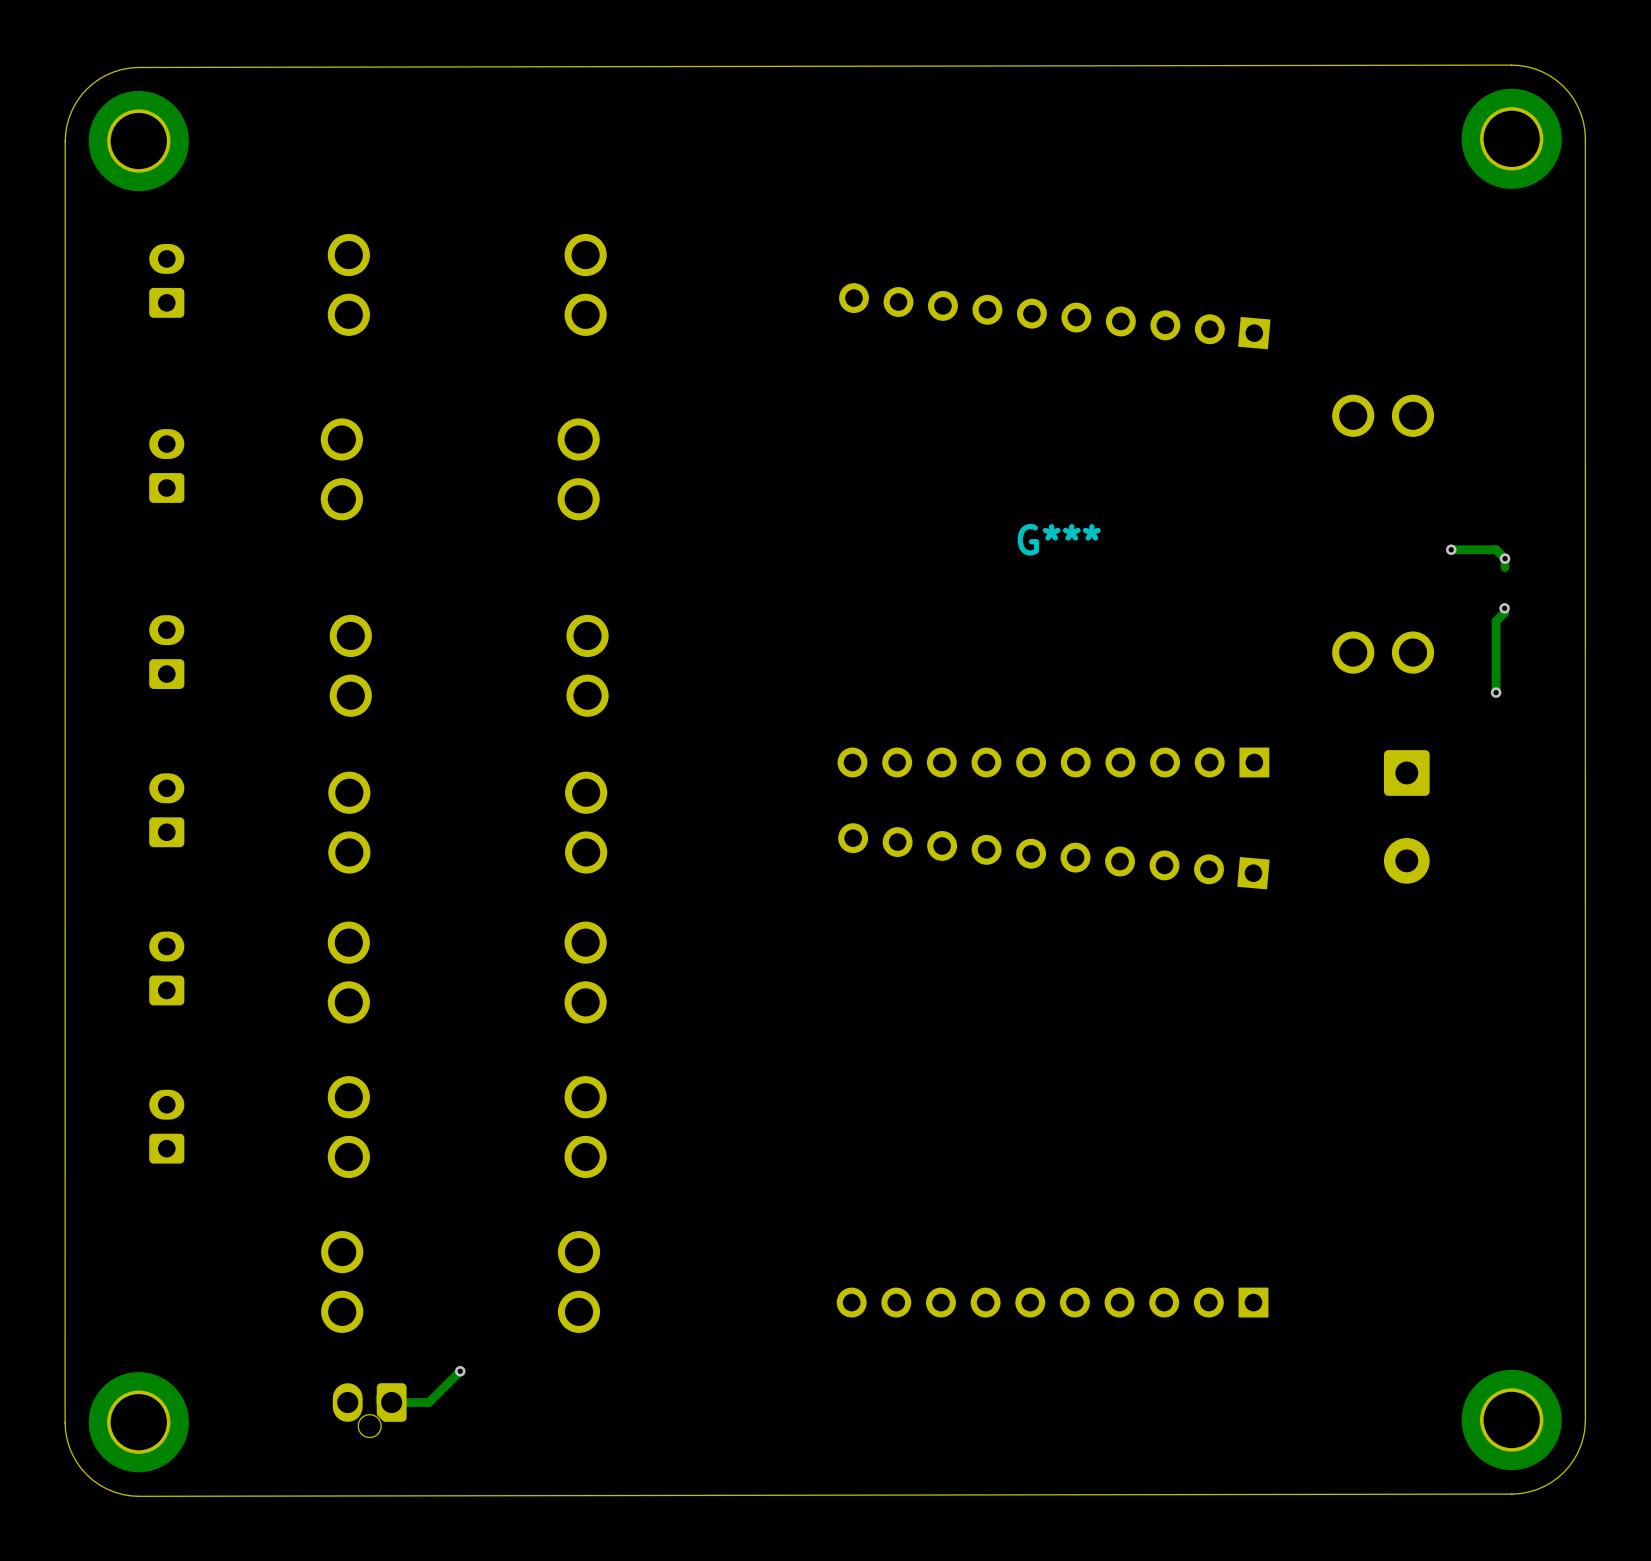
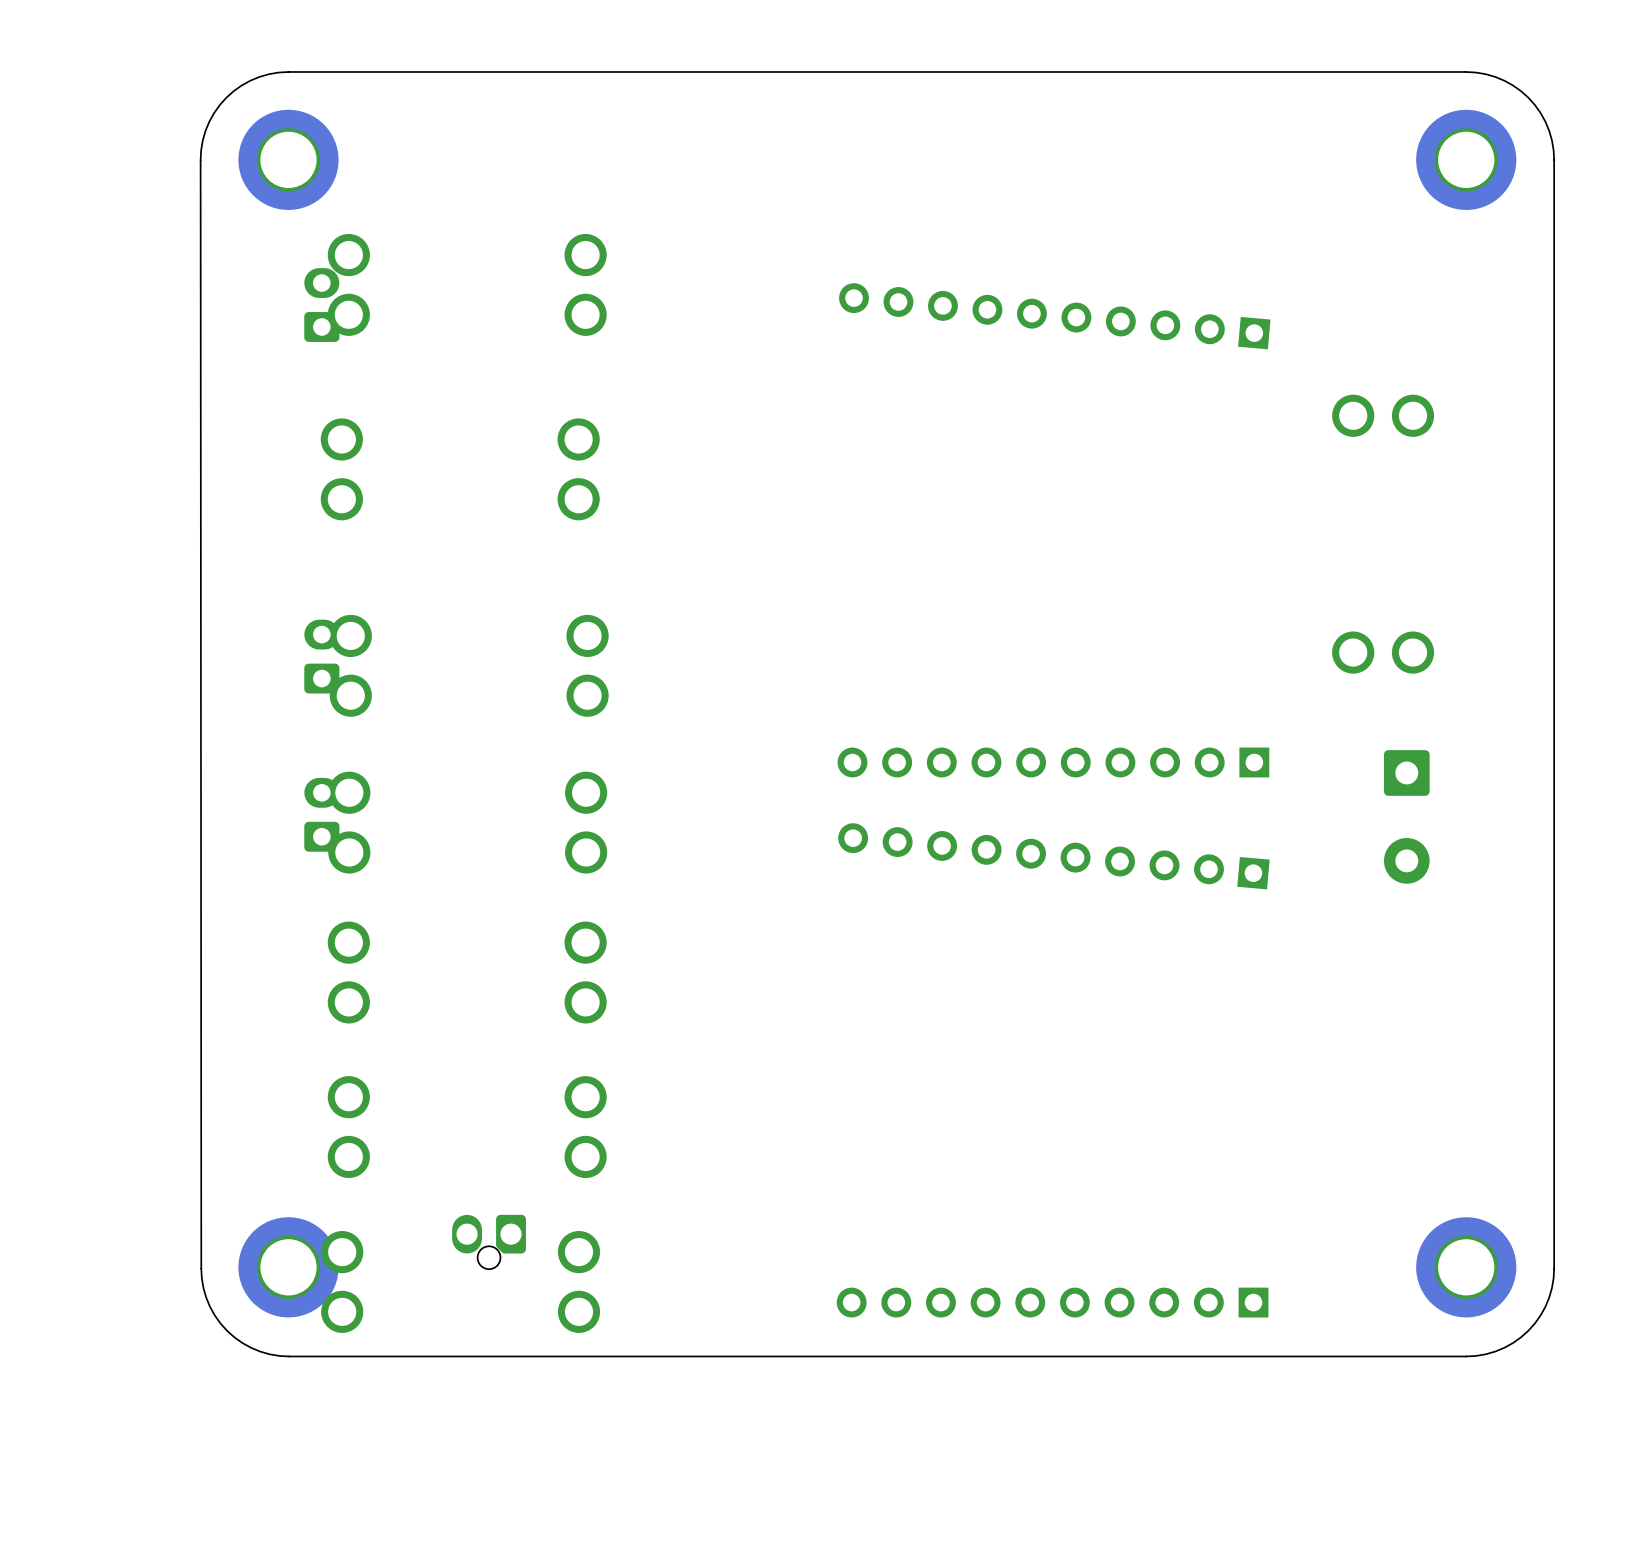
board edge: (1511, 65) (138, 67) (114, 71) (99, 78) (86, 89) (72, 109) (67, 124) (65, 141) (65, 1422) (69, 1447) (76, 1461) (86, 1474) (99, 1485) (114, 1492) (138, 1496) (1511, 1494) (1536, 1489) (1551, 1482) (1563, 1472) (1574, 1459) (1581, 1444) (1585, 1420) (1585, 138) (1581, 114) (1573, 99) (1563, 86) (1550, 76) (1535, 69) (1511, 65) -> (1466, 71) (1485, 74) (1504, 80) (1528, 97) (1540, 113) (1549, 130) (1554, 159) (1554, 1268) (1549, 1297) (1540, 1315) (1528, 1330) (1513, 1343) (1495, 1351) (1466, 1356) (289, 1356) (260, 1351) (242, 1343) (227, 1330) (214, 1315) (206, 1297) (201, 1268) (200, 160) (202, 140) (209, 121) (226, 97) (241, 85) (259, 76) (288, 71) (1466, 71)
part position: (1511, 138) -> (1466, 159)
part position: (138, 141) -> (288, 159)
part: (166, 280) -> none
part: none -> (321, 305)
part: (166, 466) -> none
G***: (1059, 539) -> none
track: (1451, 549) (1496, 549) (1505, 558) (1505, 567) -> none
via: (1451, 549) -> none
via: (1505, 558) -> none
track: (1504, 608) (1504, 612) (1496, 621) (1496, 692) -> none
via: (1504, 608) -> none
part: (166, 652) -> none
part: none -> (321, 656)
via: (1496, 692) -> none
part: (166, 810) -> none
part: none -> (321, 814)
part: (166, 968) -> none
part: (166, 1126) -> none
track: (460, 1371) (428, 1402) (391, 1402) (388, 1399) -> none
via: (460, 1371) -> none
part position: (369, 1410) -> (489, 1241)
part position: (1511, 1419) -> (1466, 1267)
part position: (138, 1422) -> (288, 1267)

